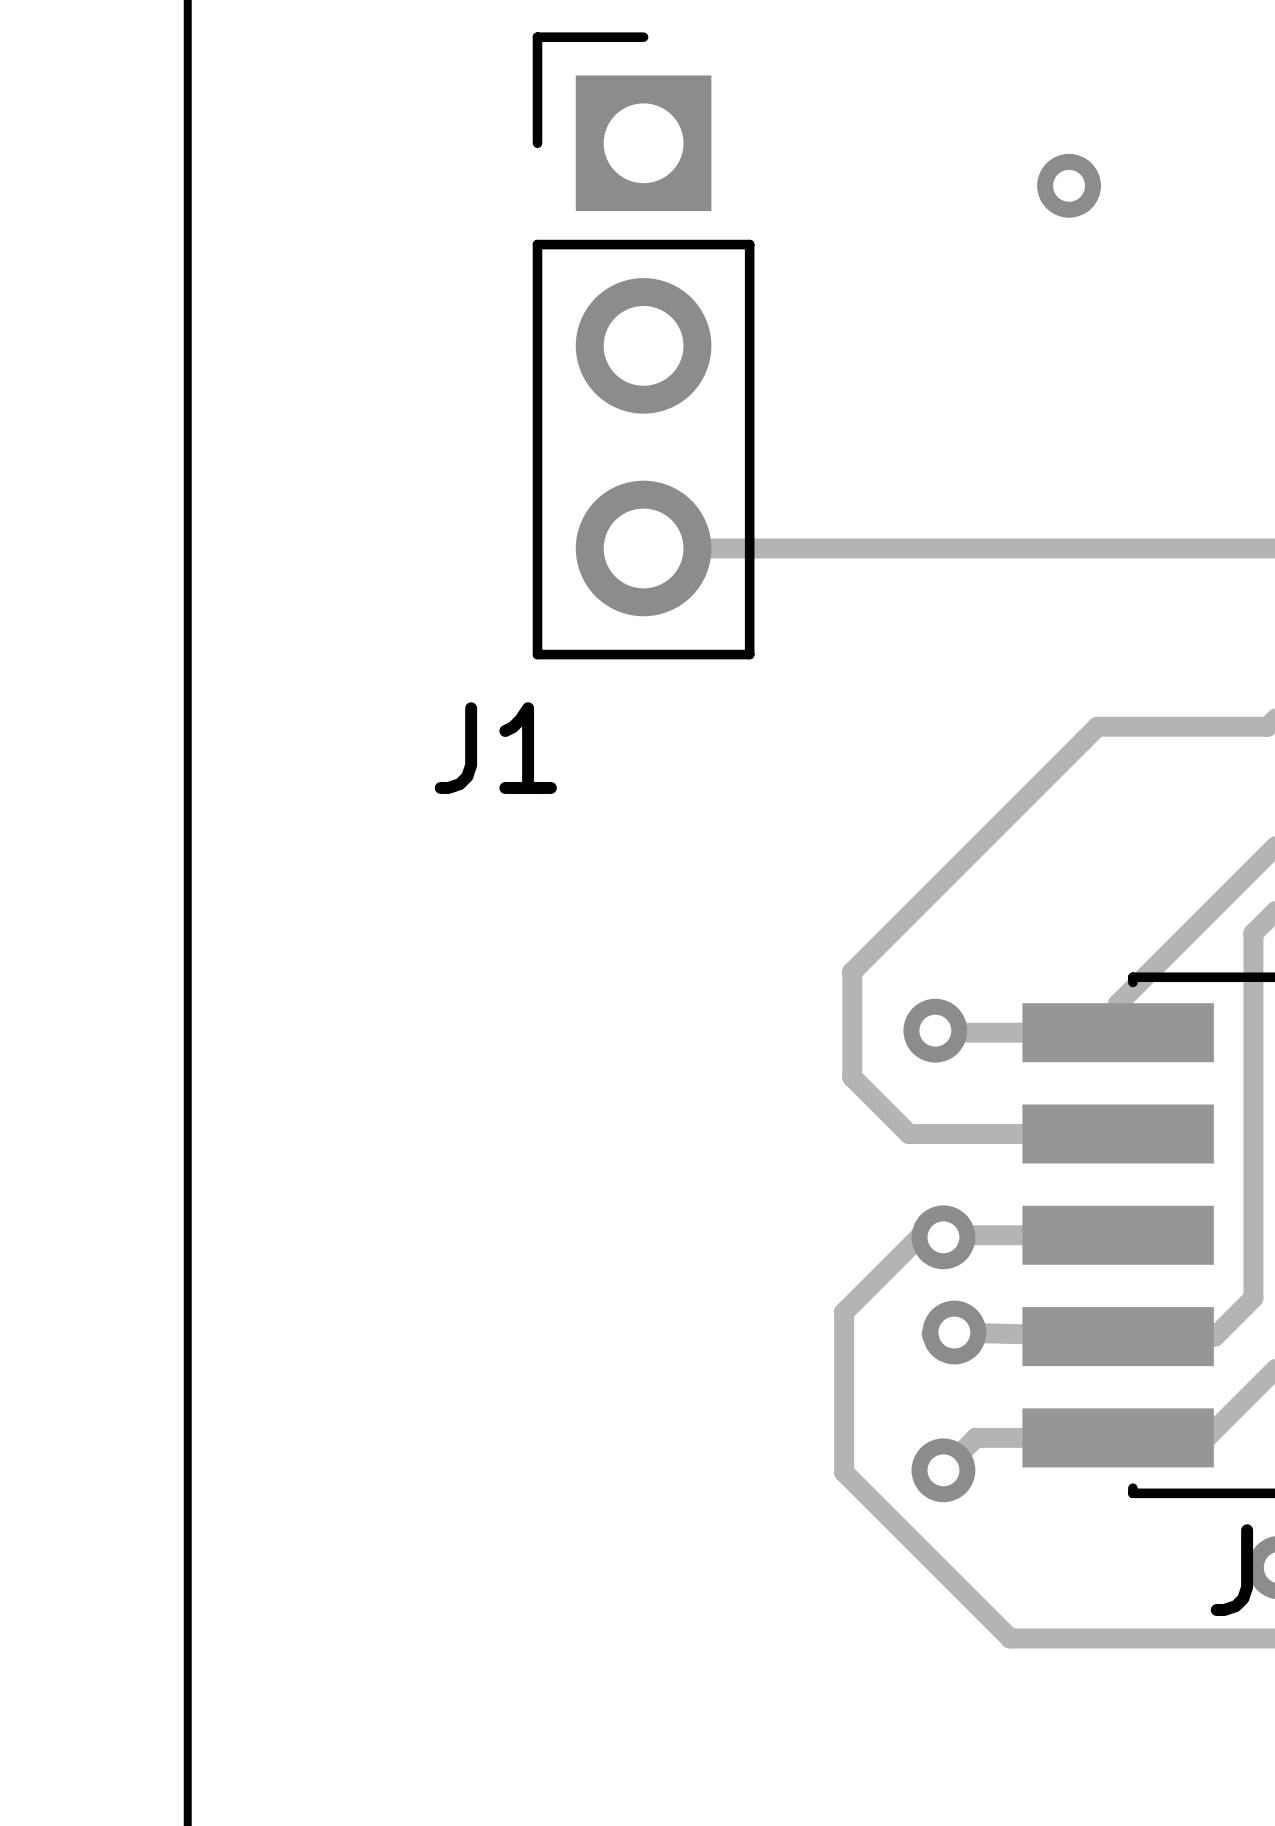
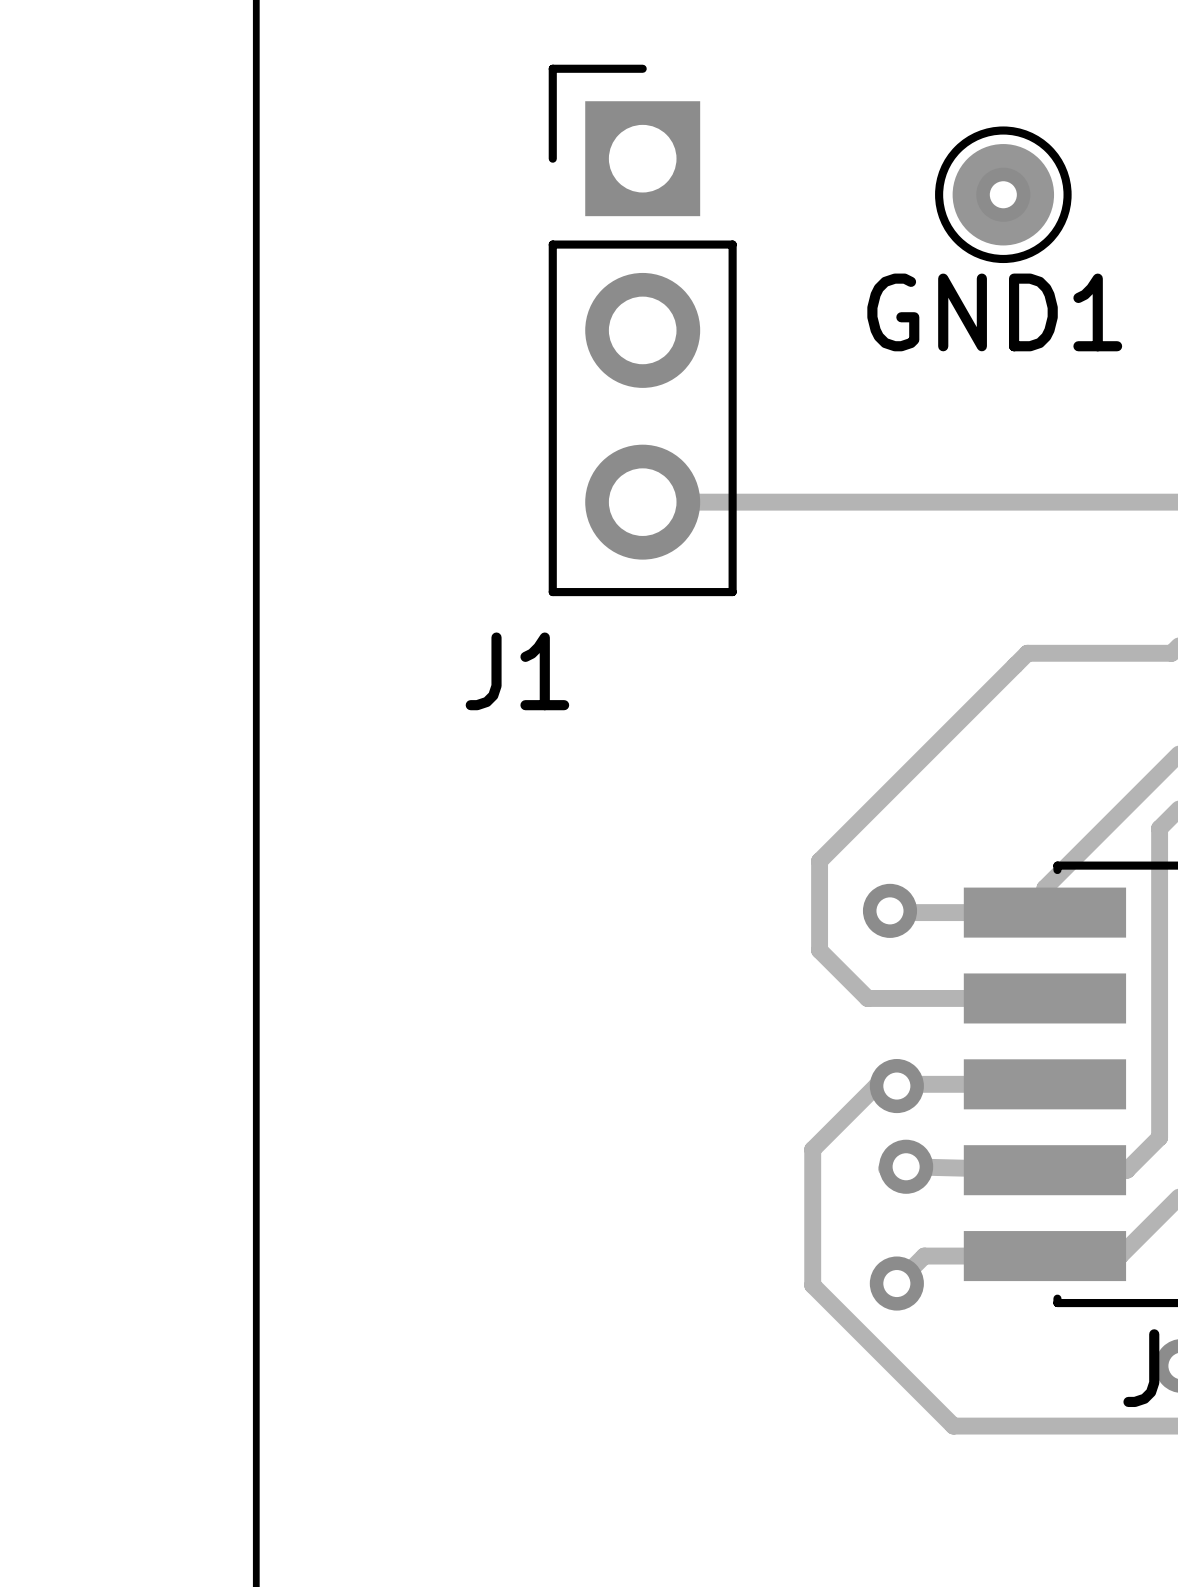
GND1: none -> (1003, 194)

